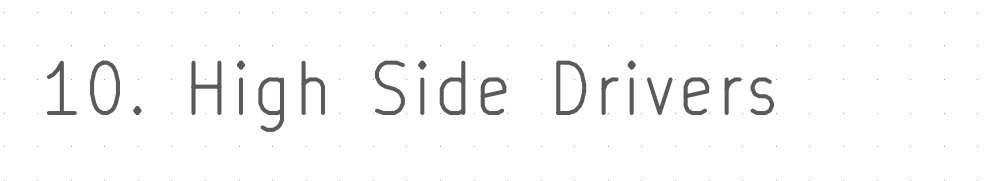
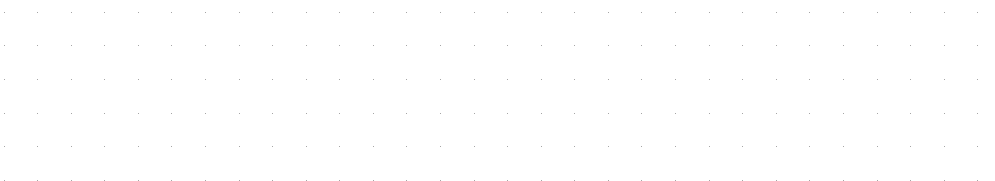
text: 10. High Side Drivers (410, 96) -> none

